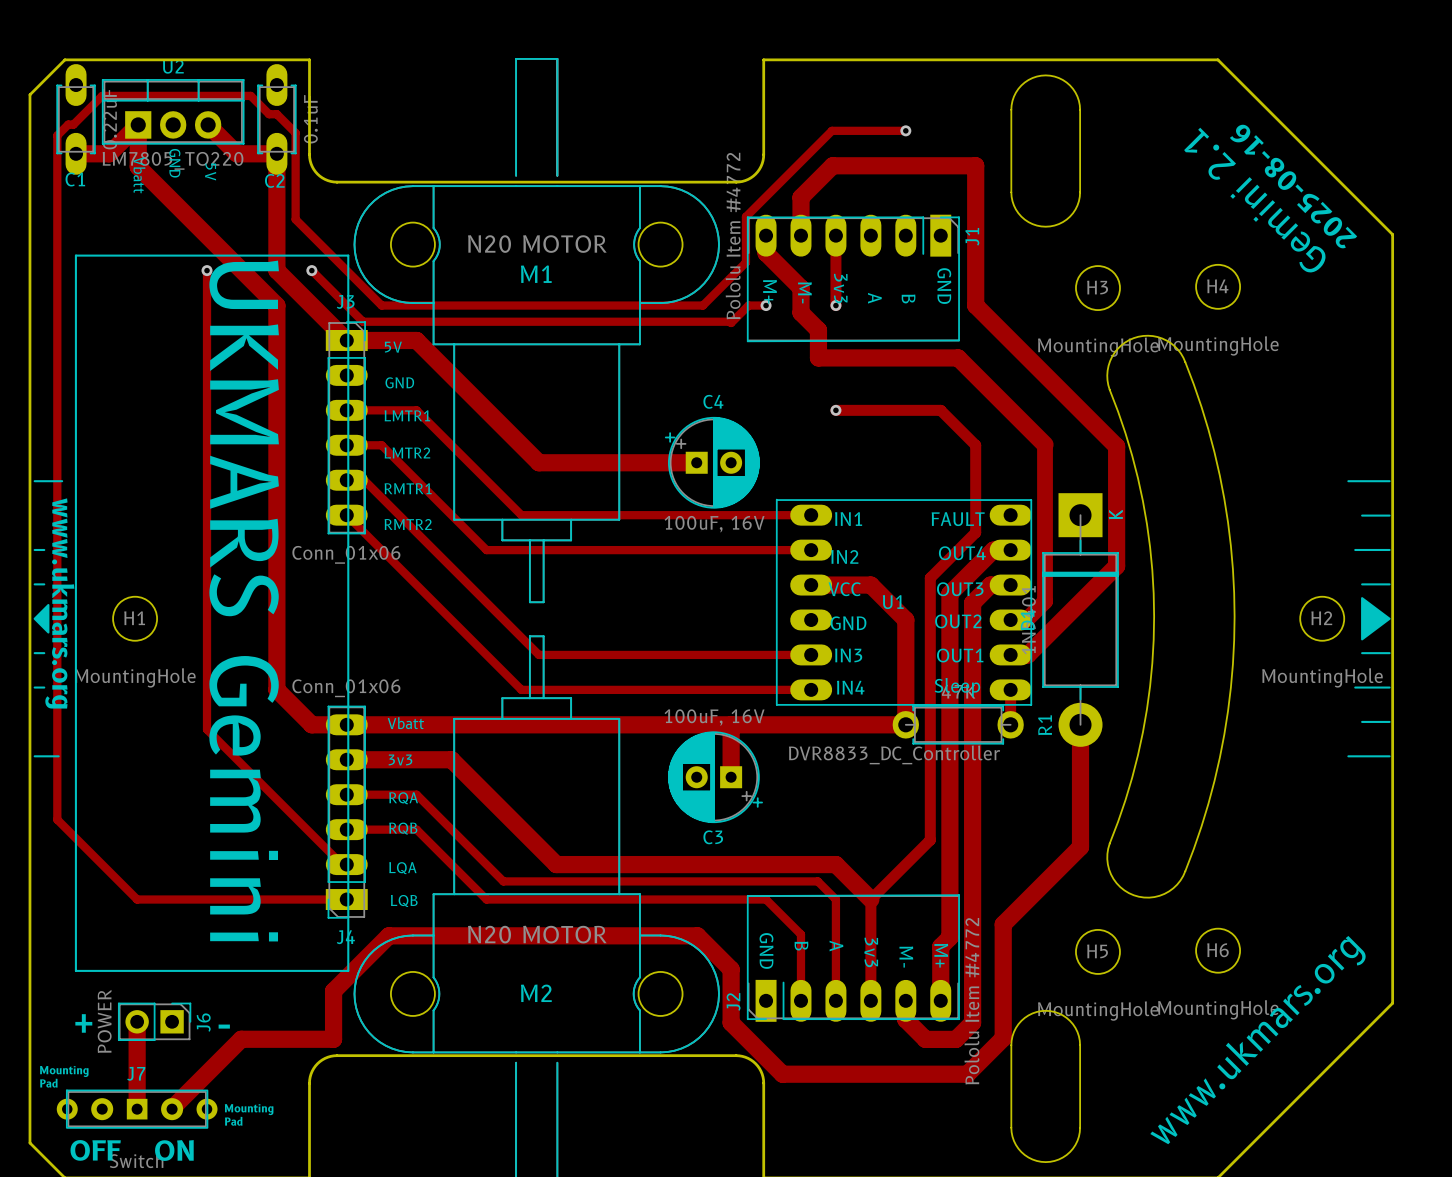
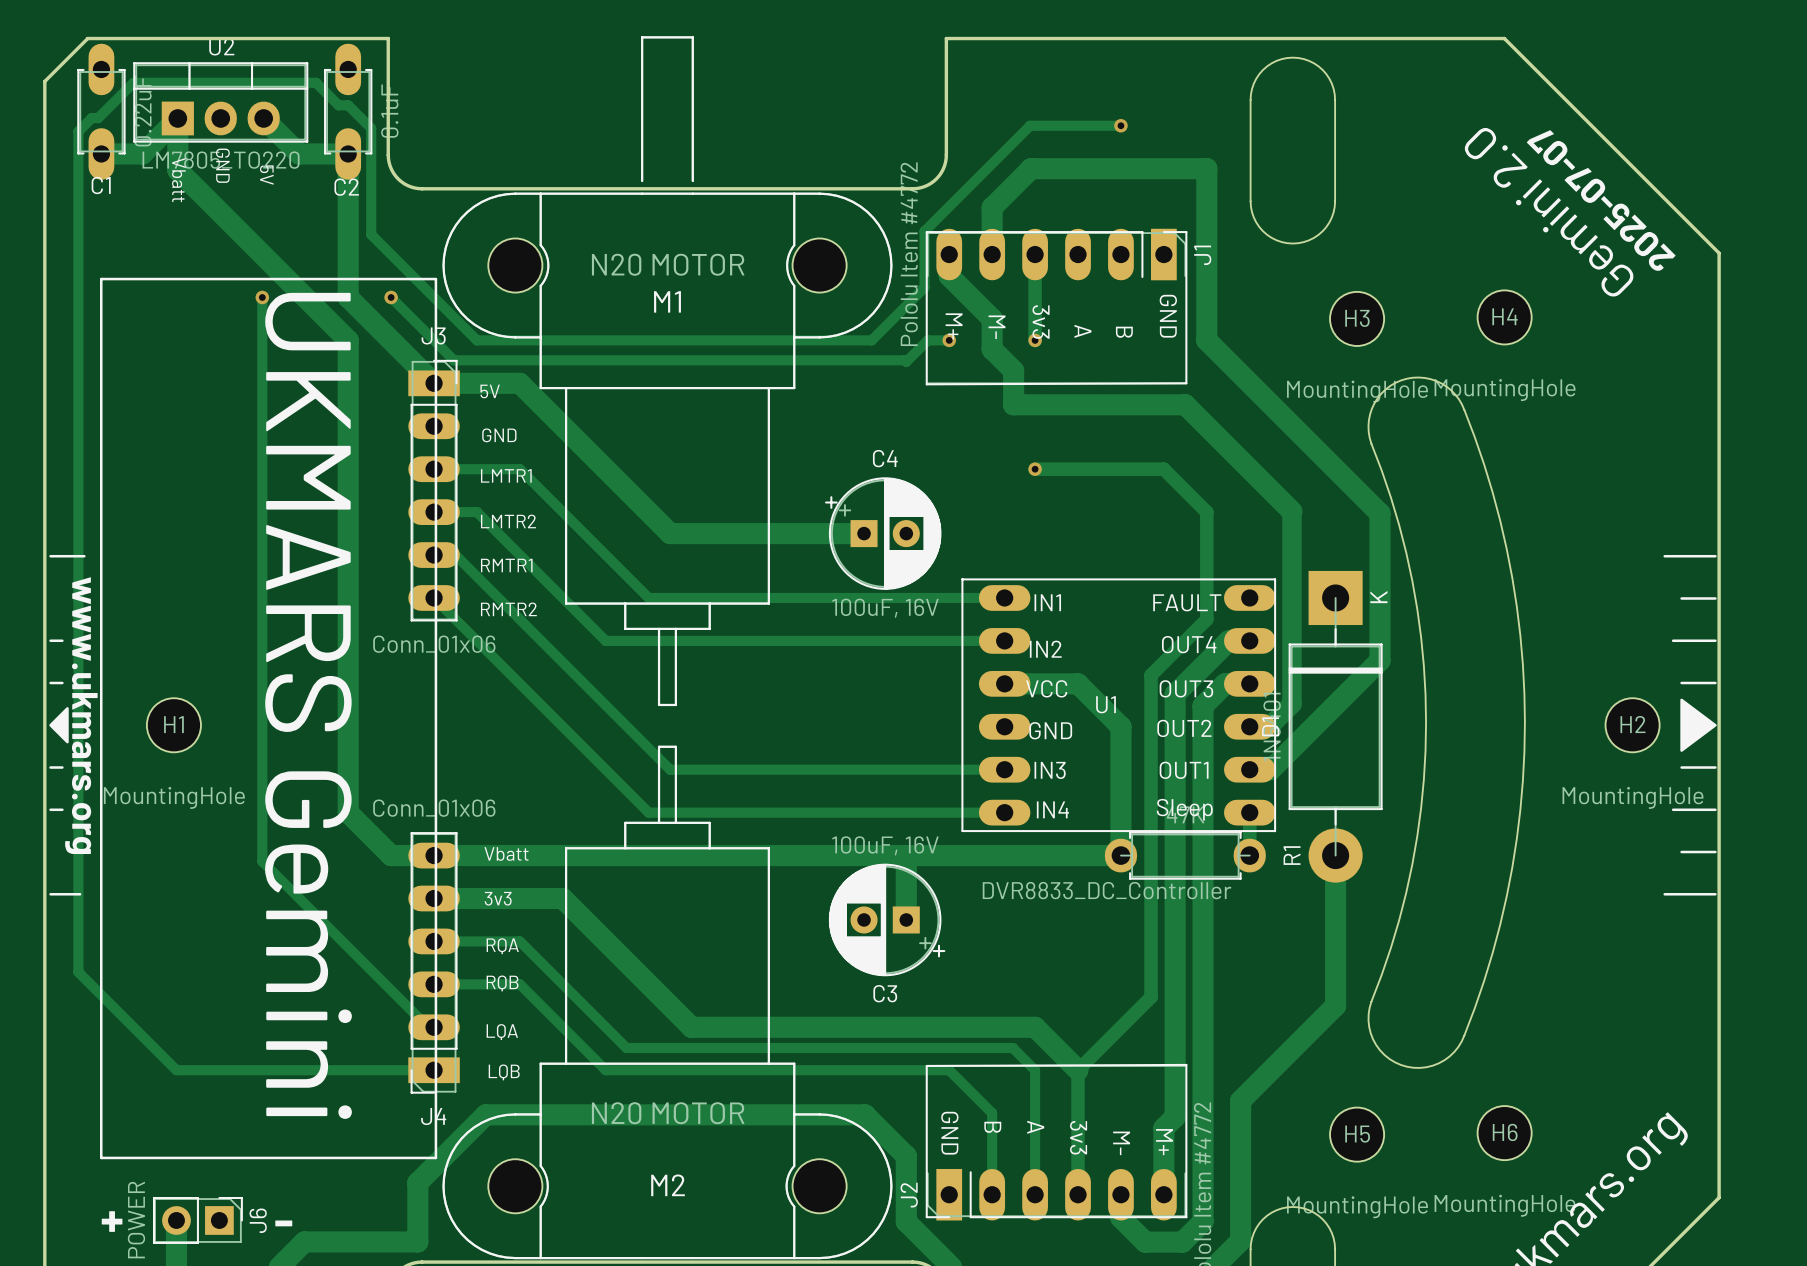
text: 2025-08-16 (1293, 186) -> 2025-07-07 (1601, 200)
text: Gemini 2.1 (1254, 200) -> Gemini 2.0 (1549, 212)

